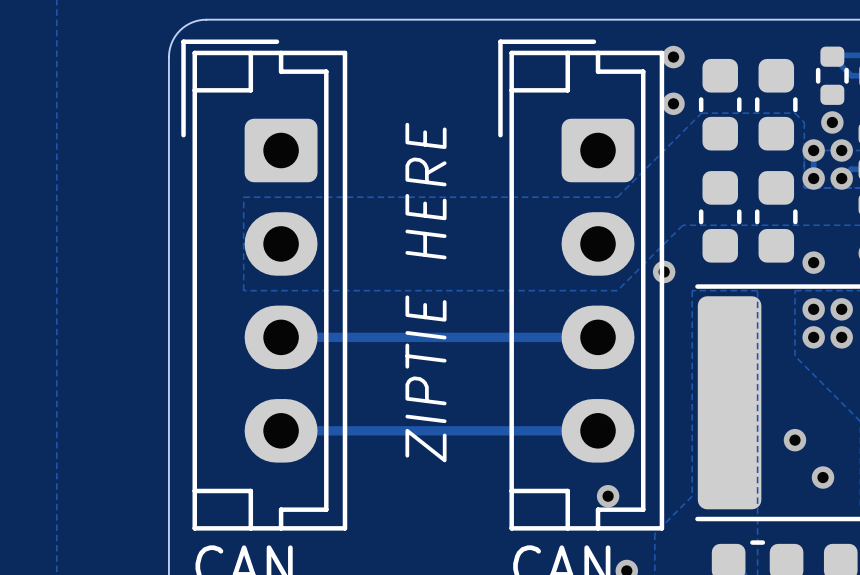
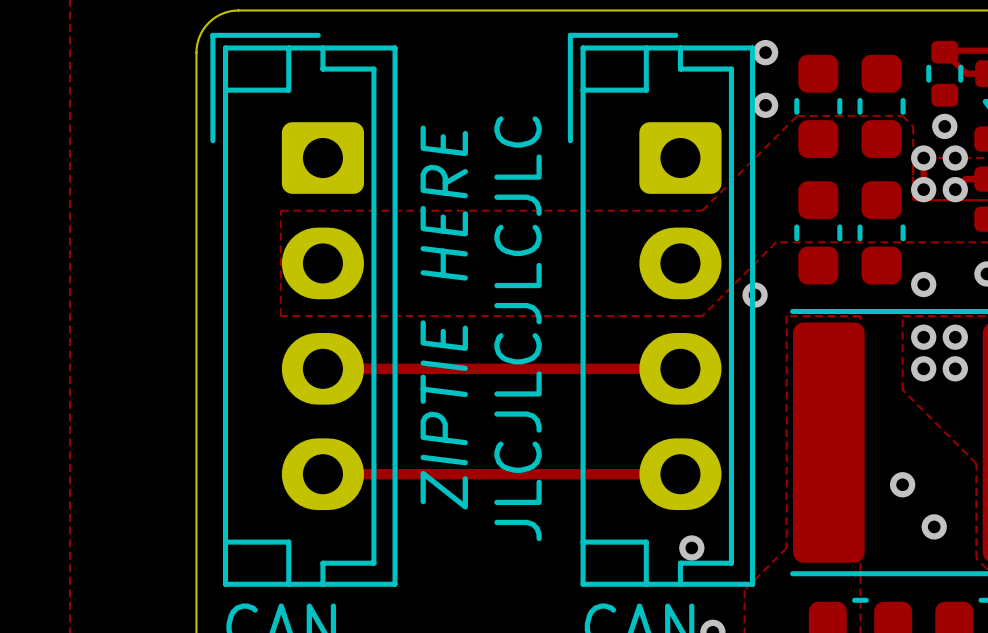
text position: ZIPTIE HERE (426, 292) -> ZIPTIE HERE (444, 317)
text: none -> JLCJLCJLCJLC (518, 328)

